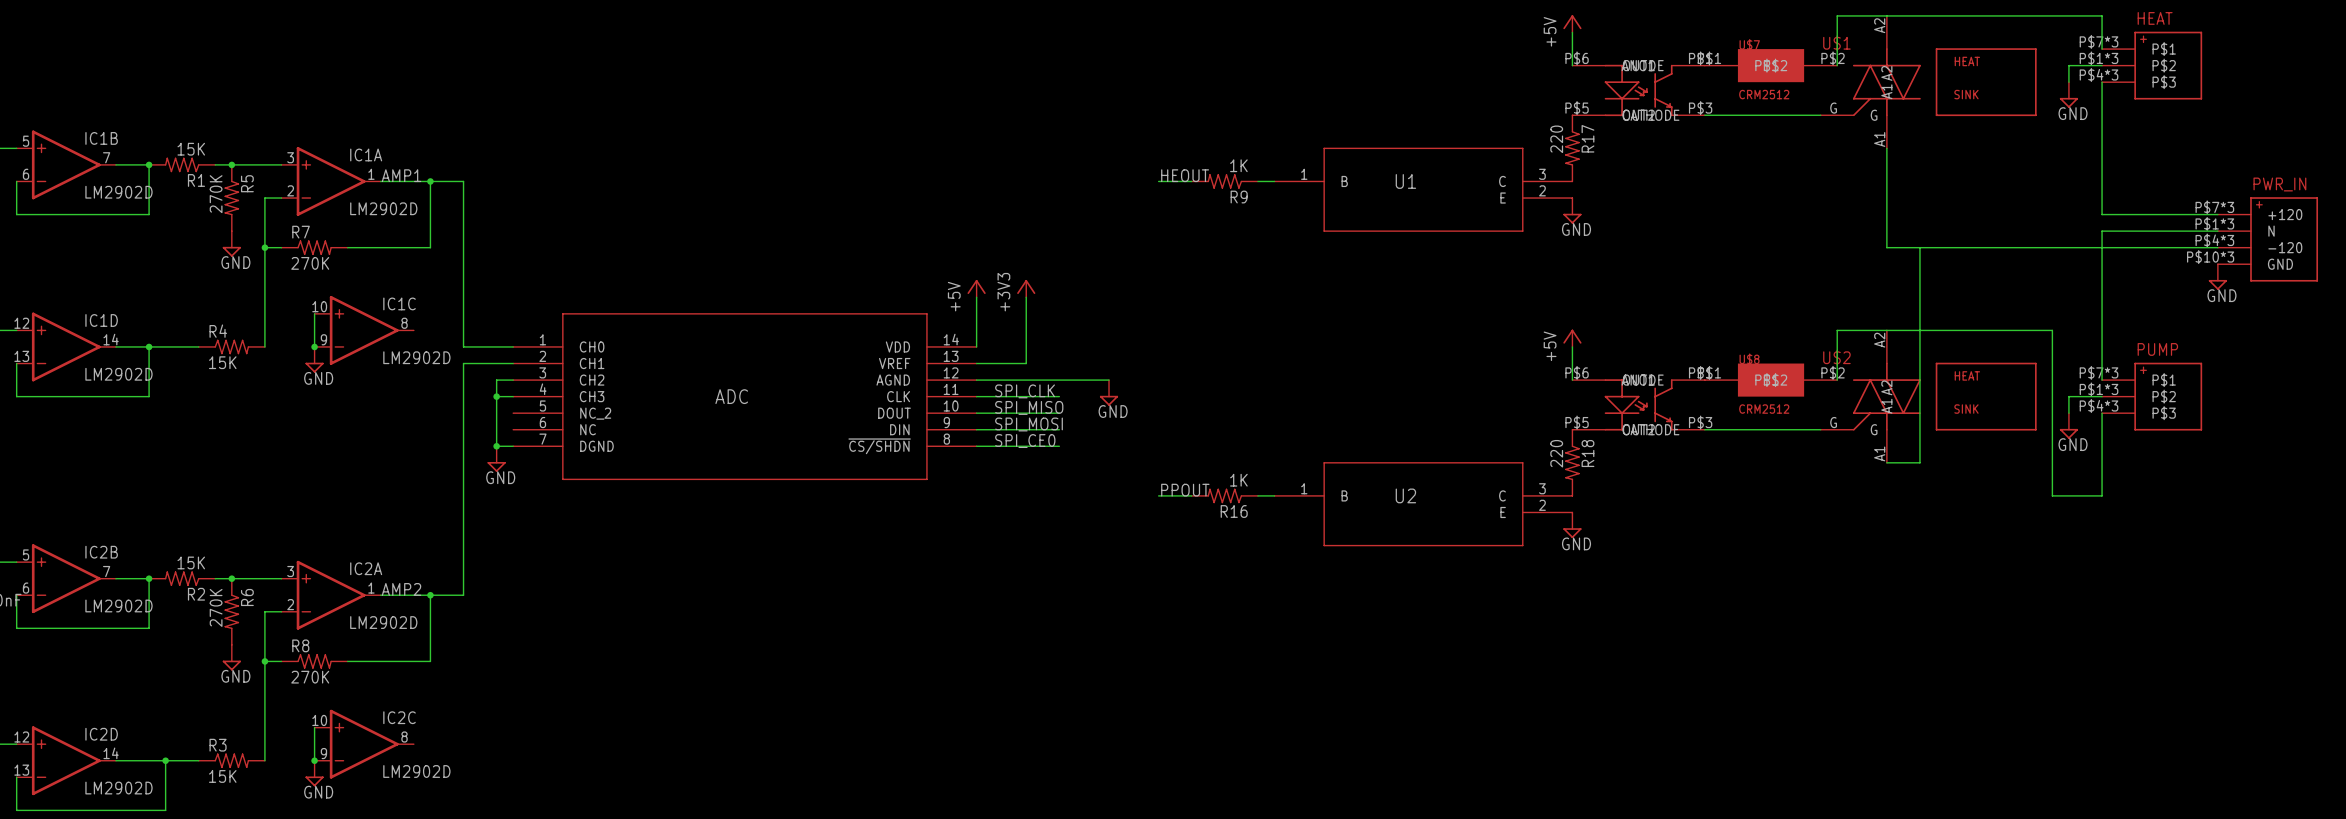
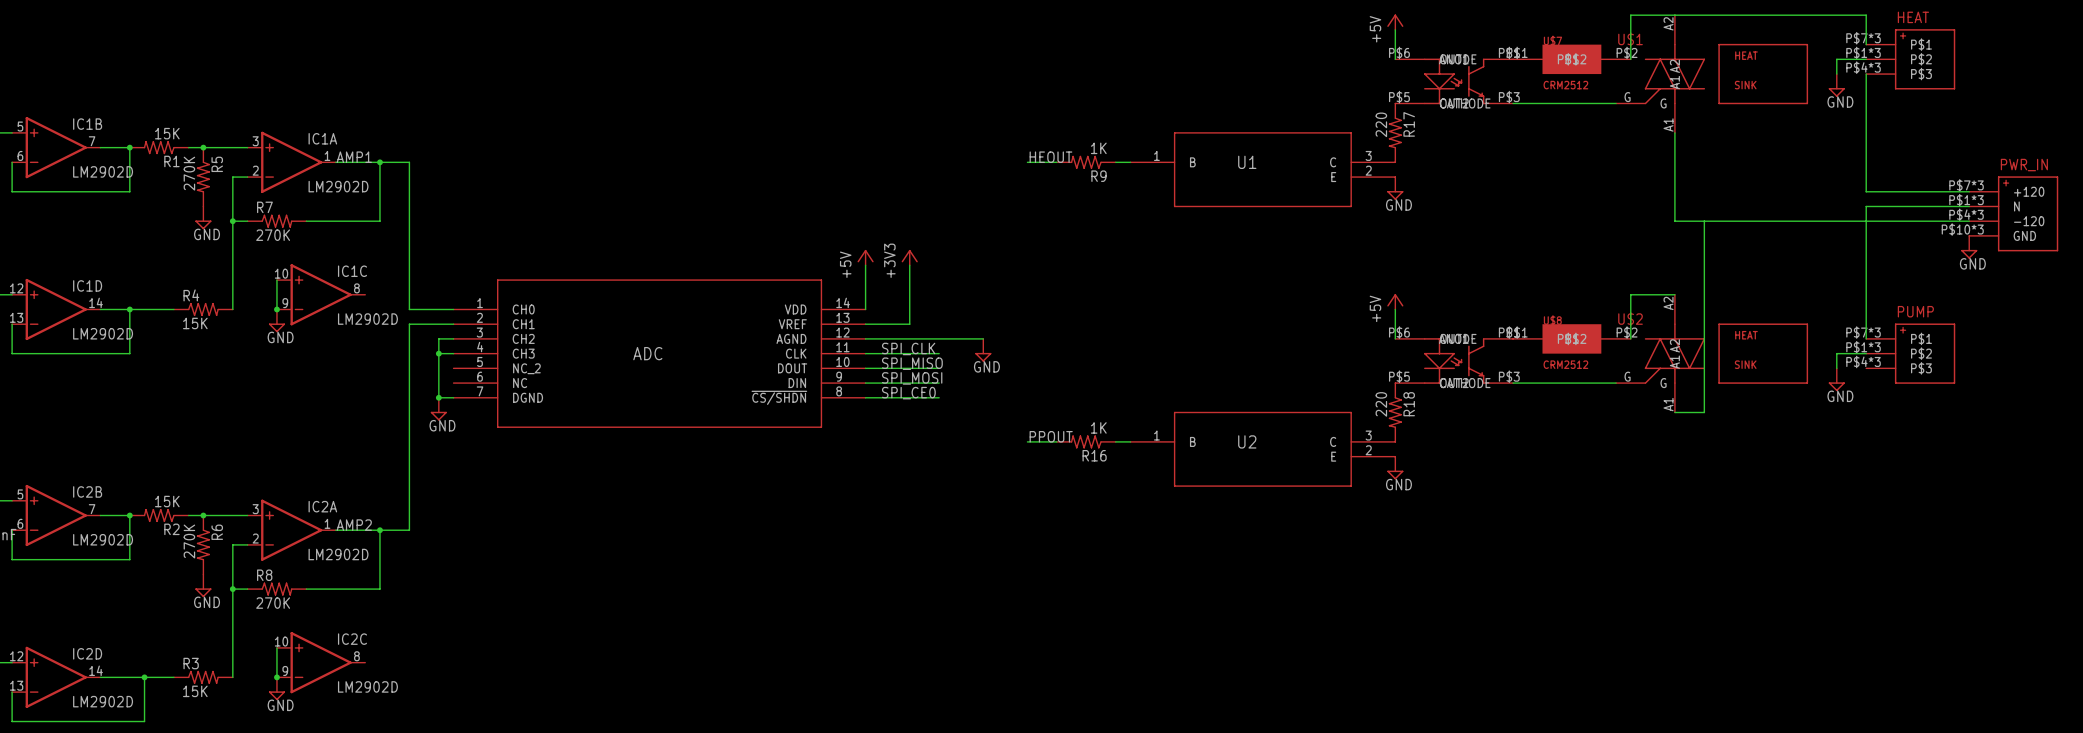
wire: (1886, 330) (2052, 330) (2052, 495) (2102, 495) (2102, 413) -> none

